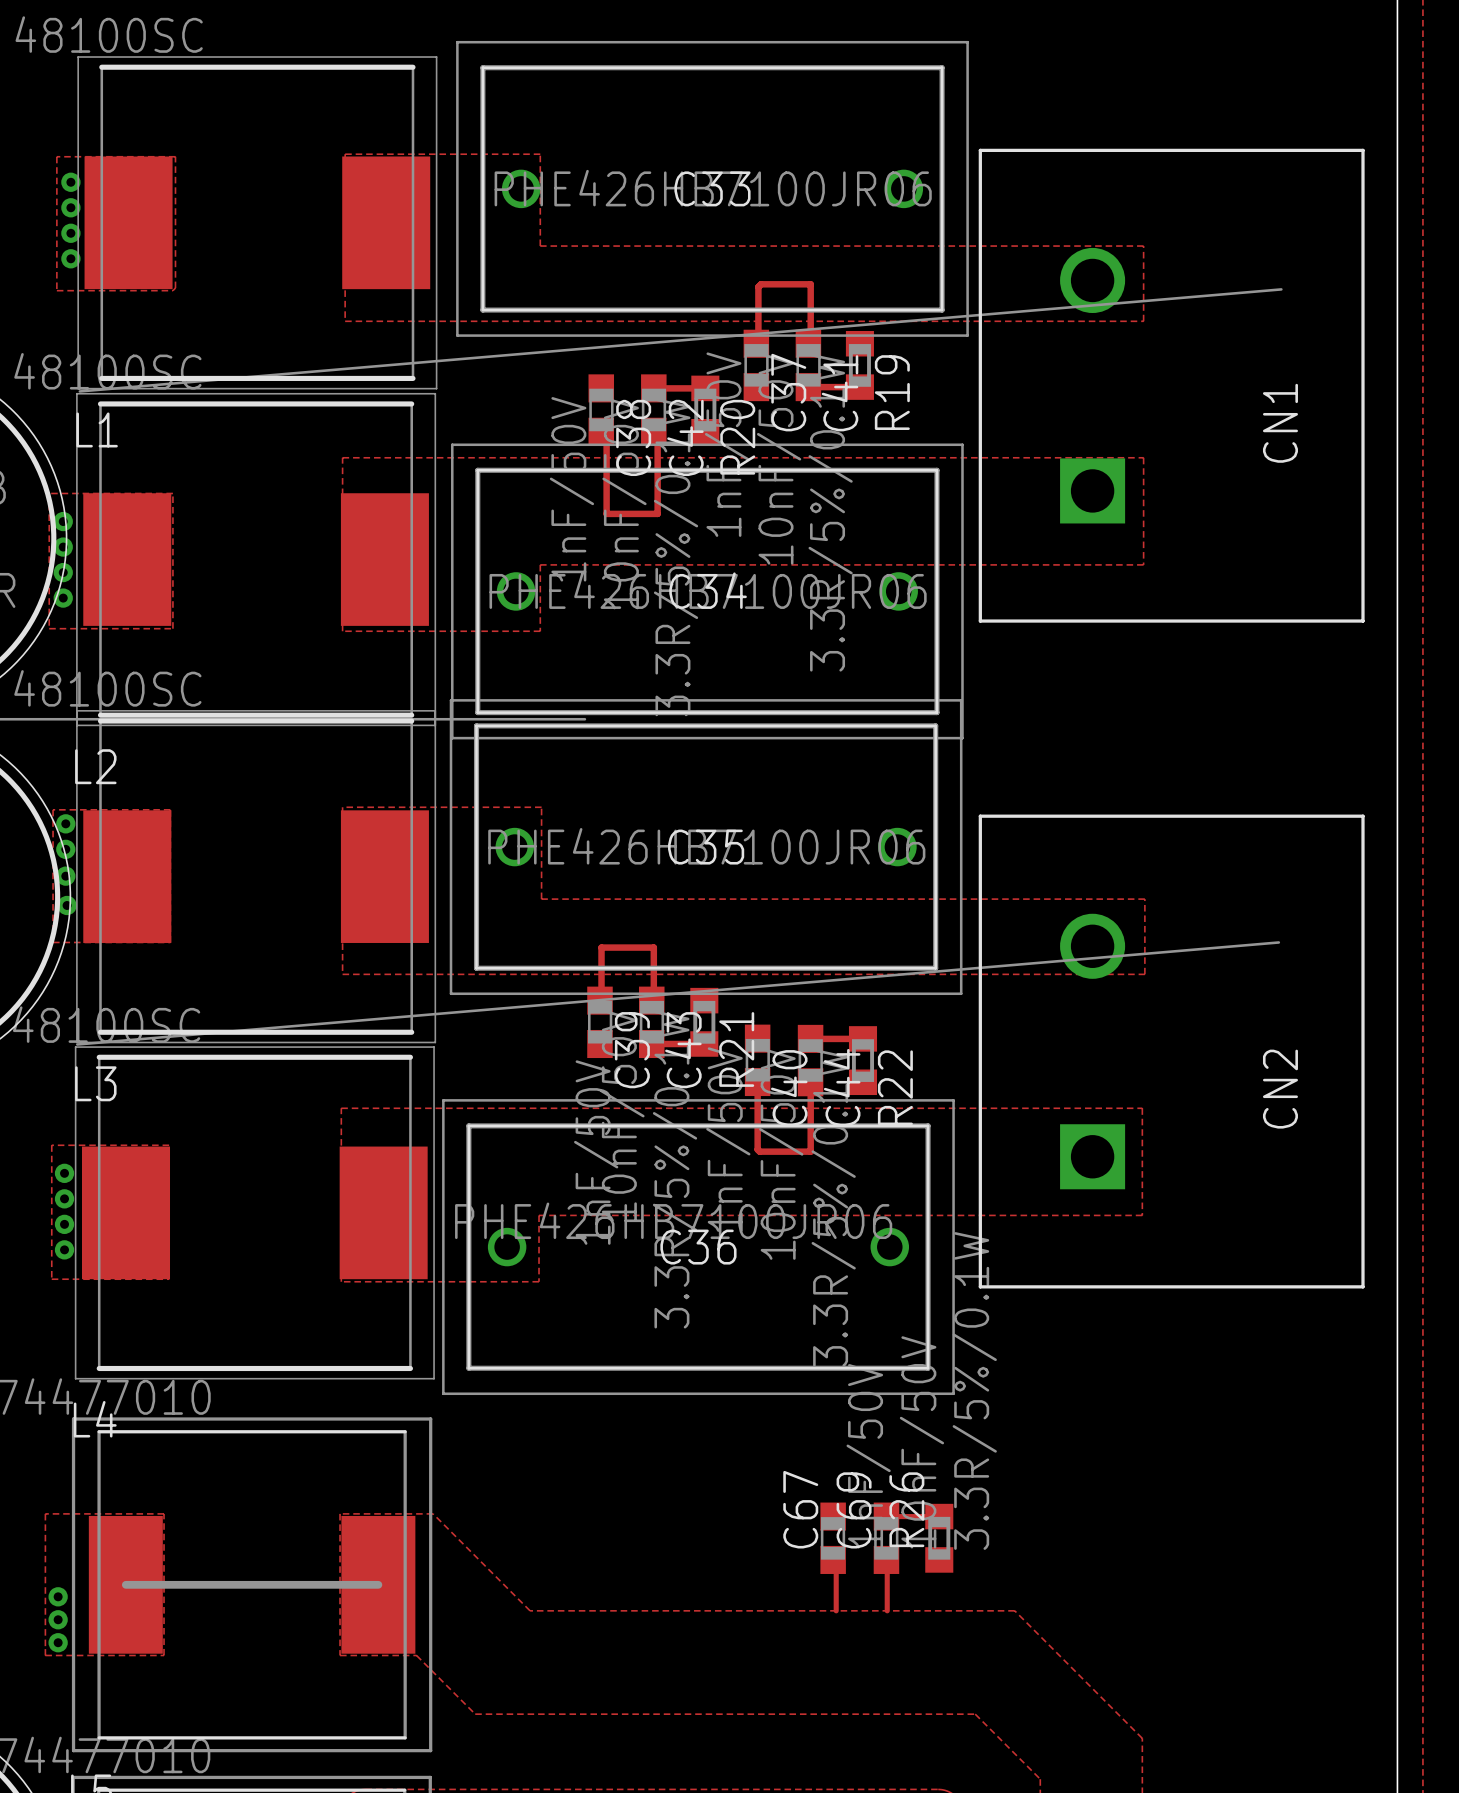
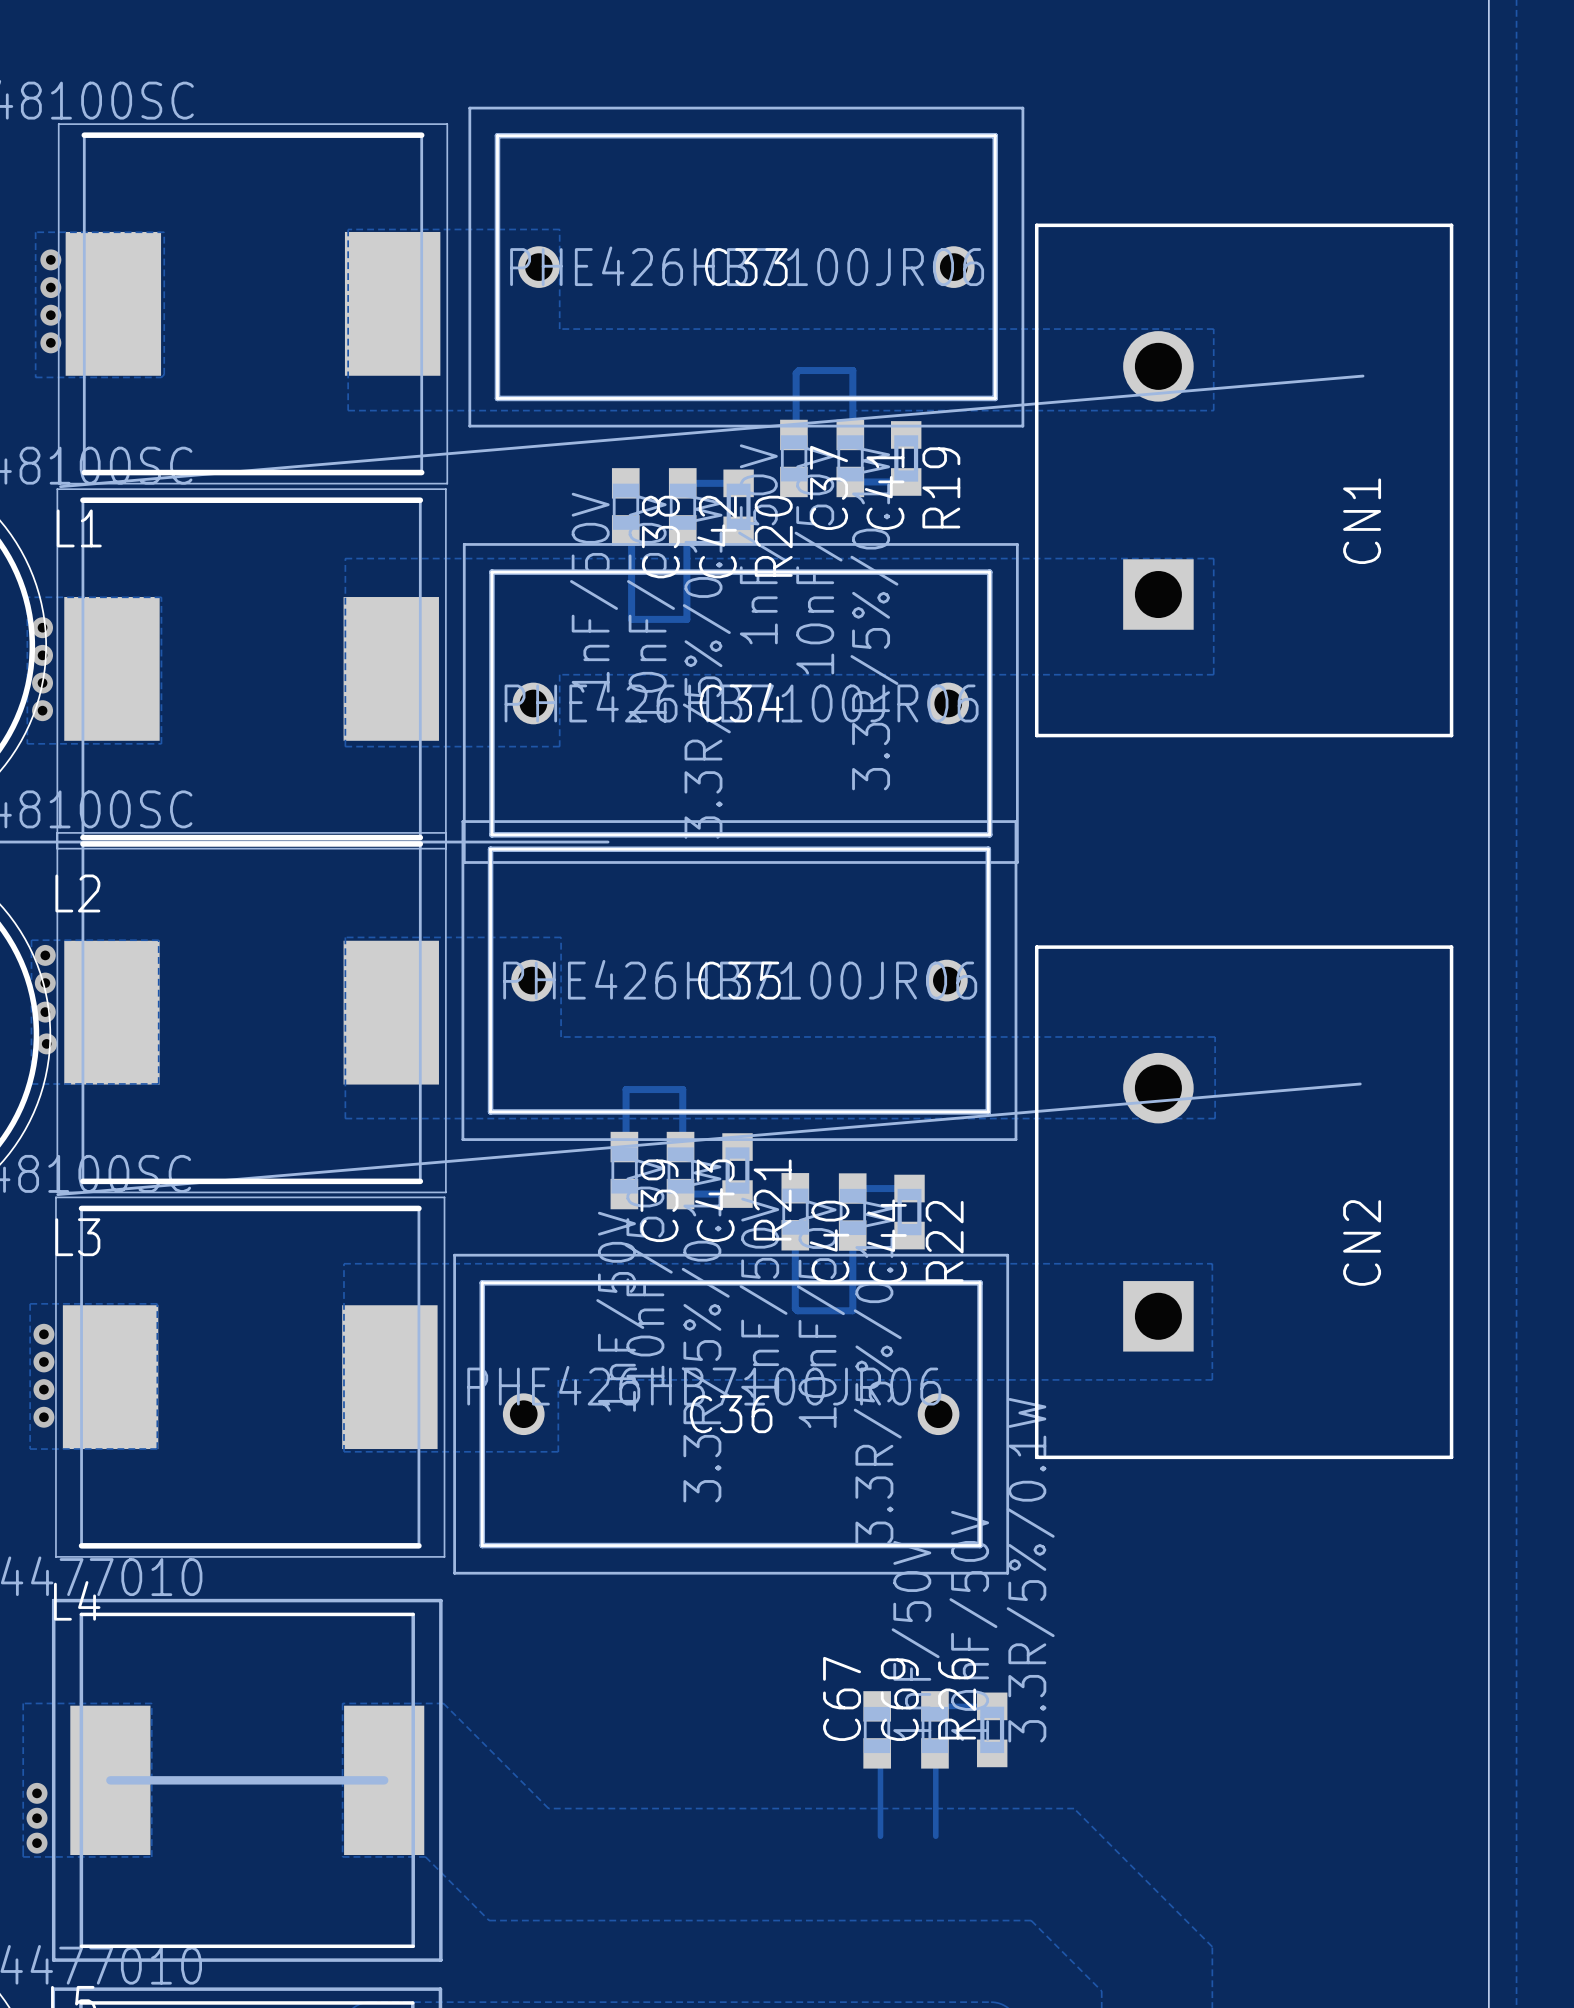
track: none -> (880, 1808) (880, 1836)
track: none -> (935, 1808) (935, 1836)

